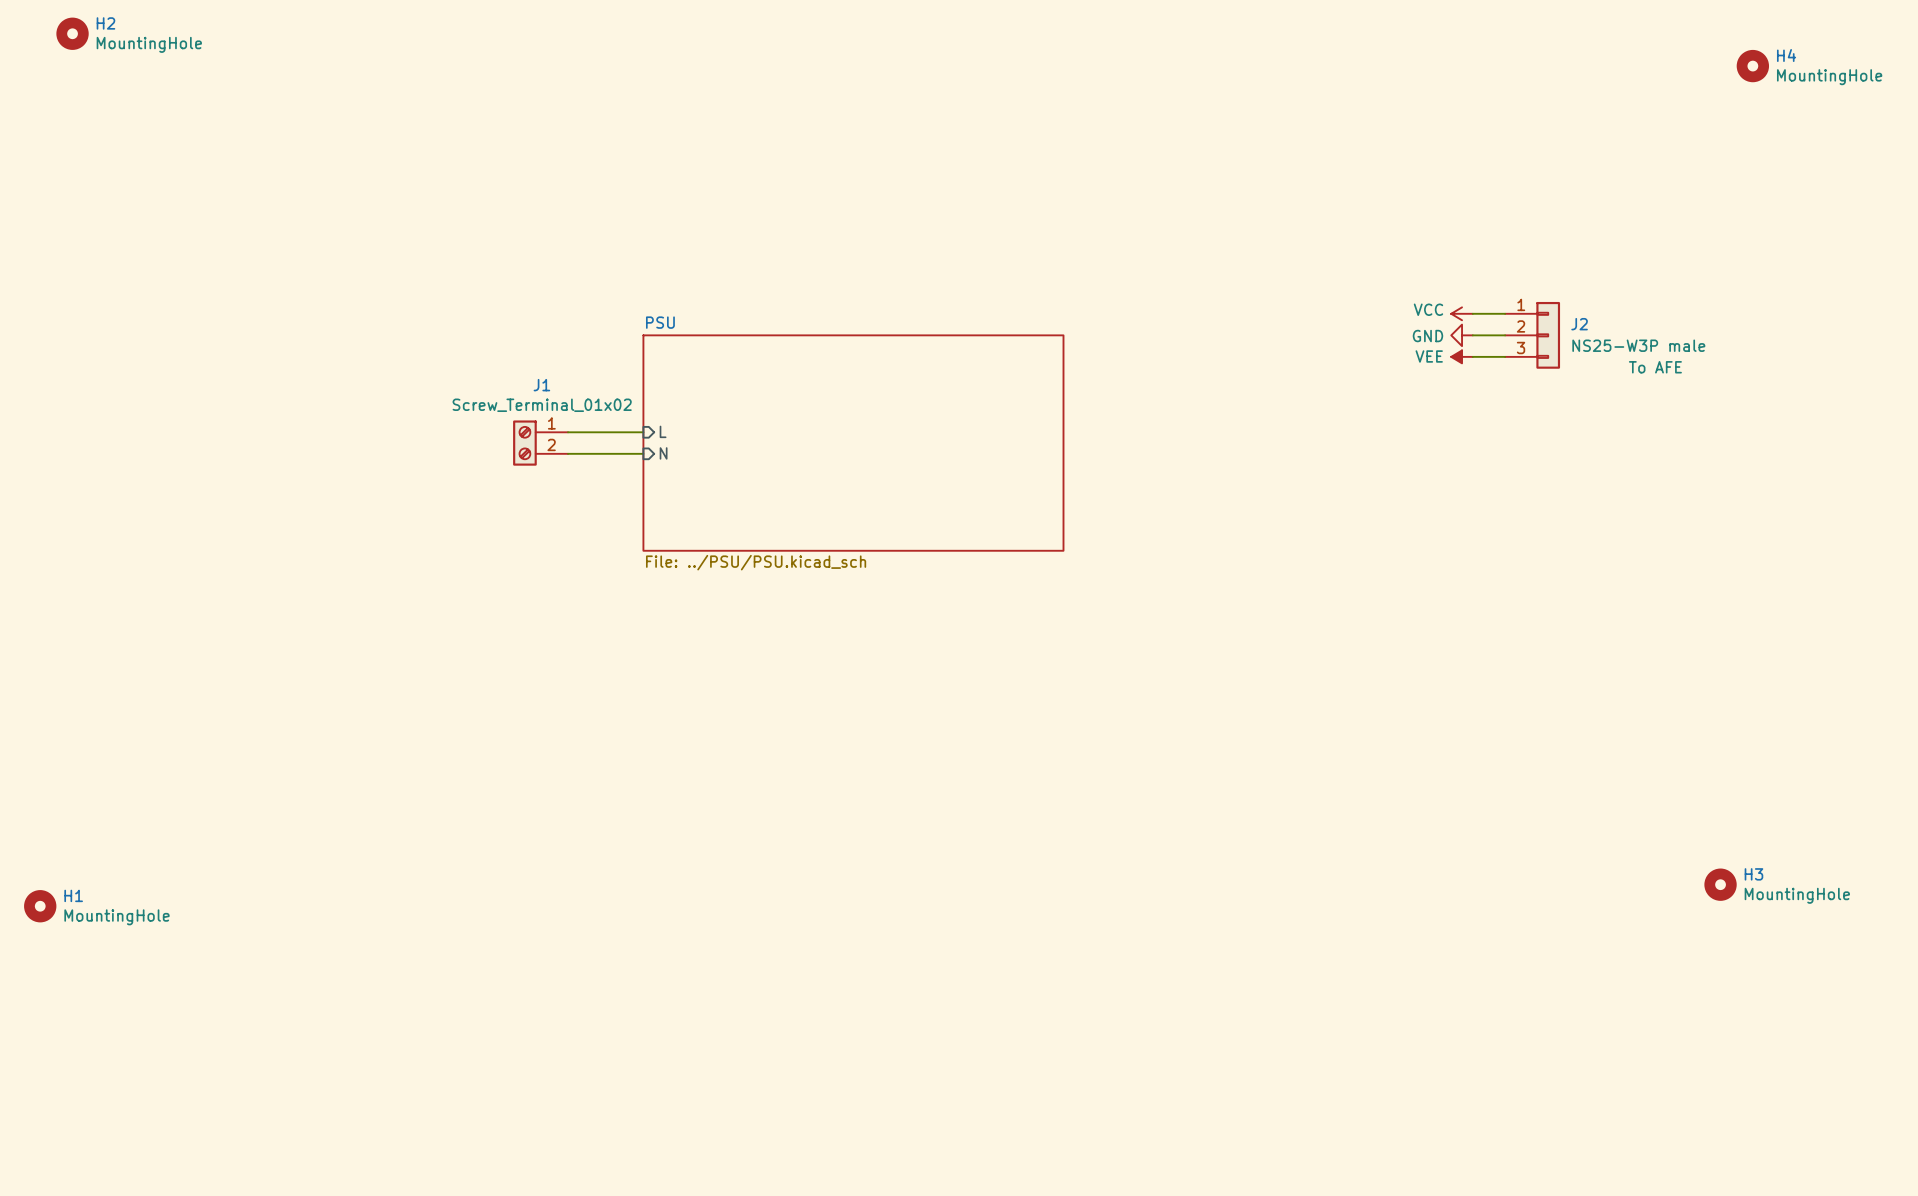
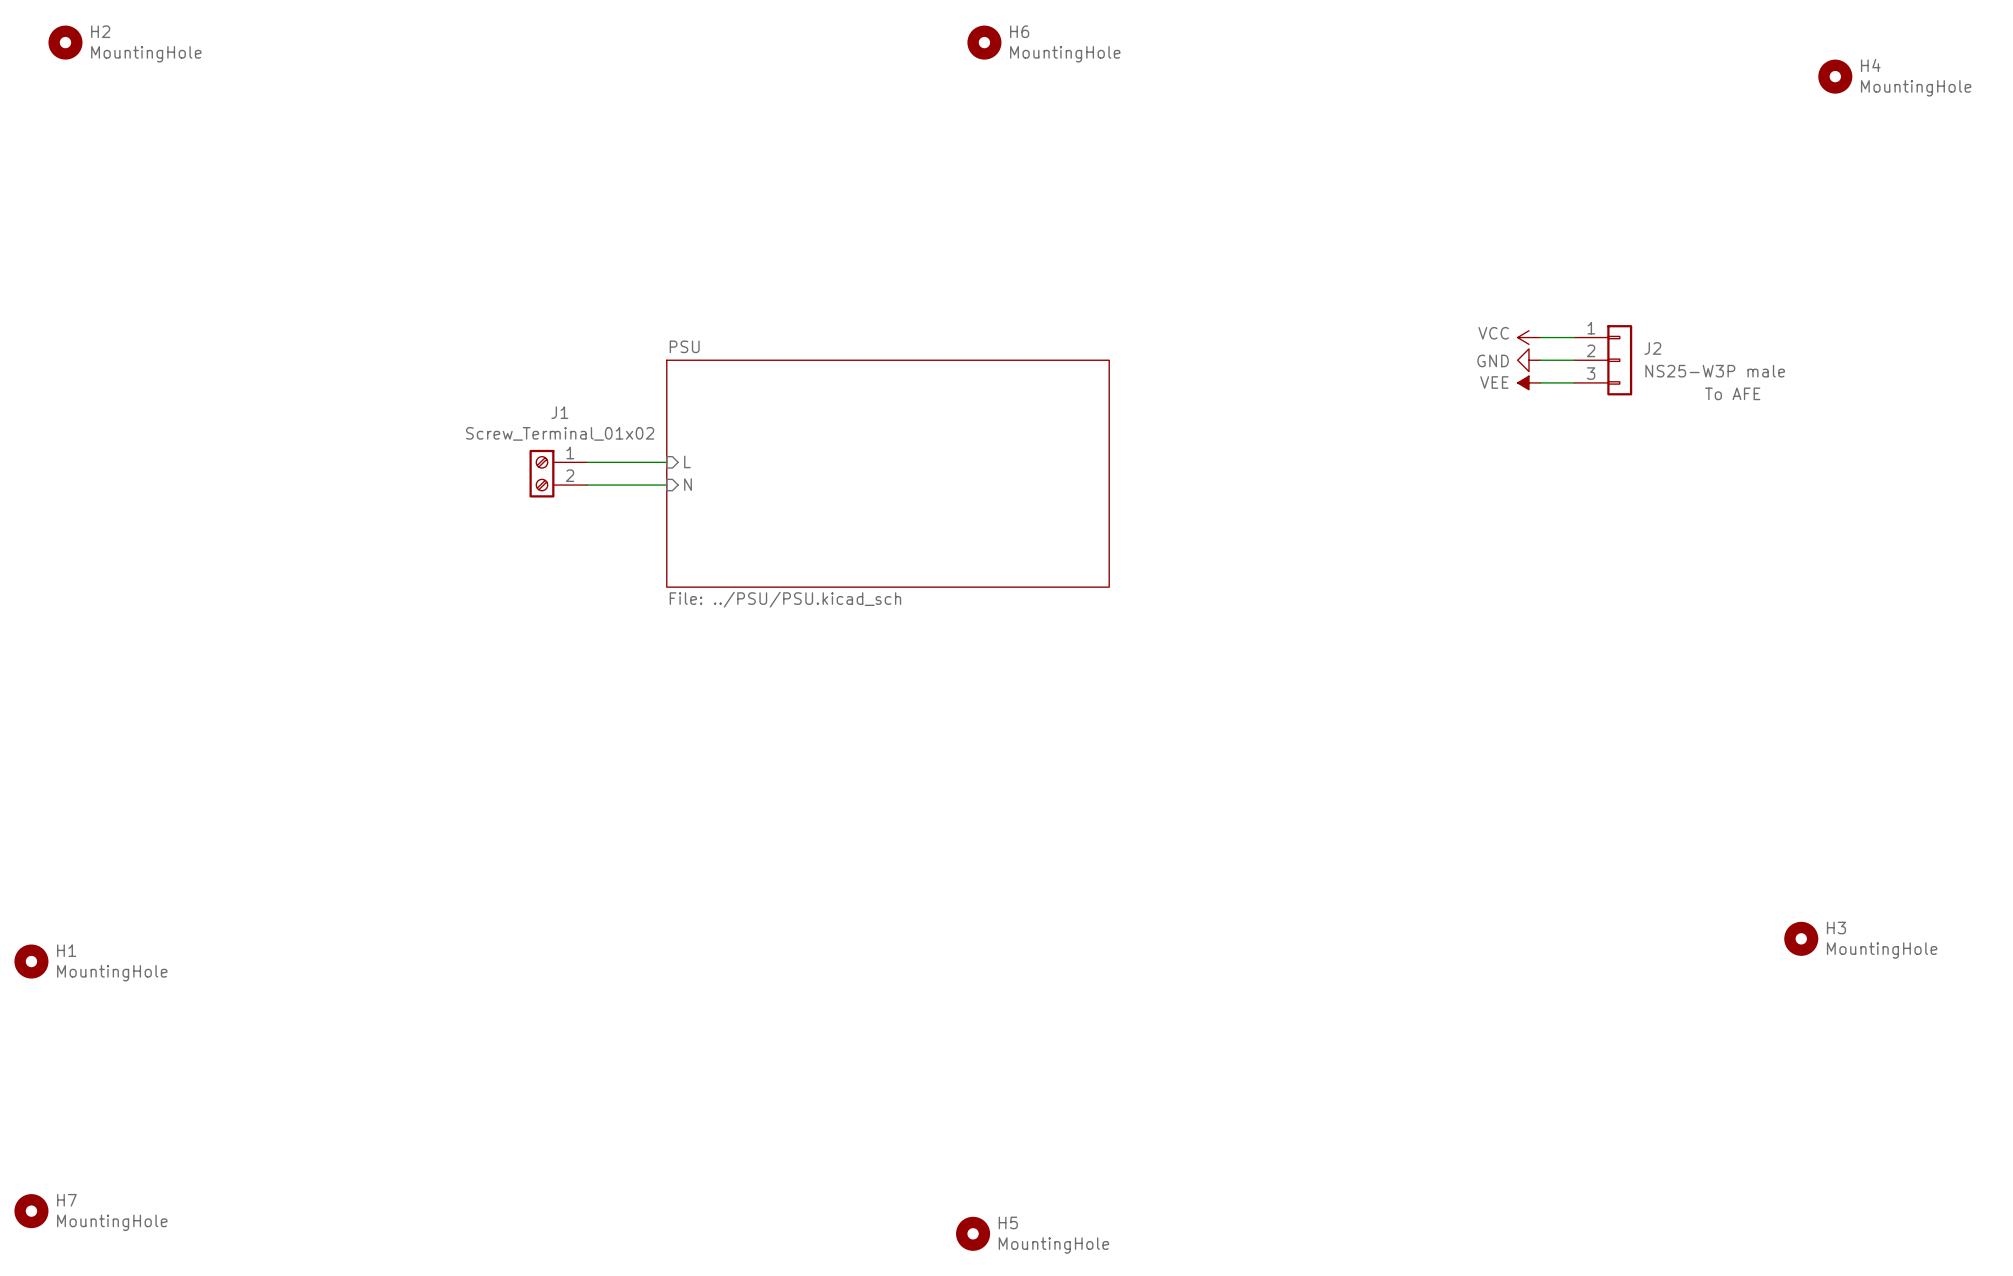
H6: none -> MountingHole (984, 42)
H7: none -> MountingHole (31, 1211)
H5: none -> MountingHole (973, 1233)

